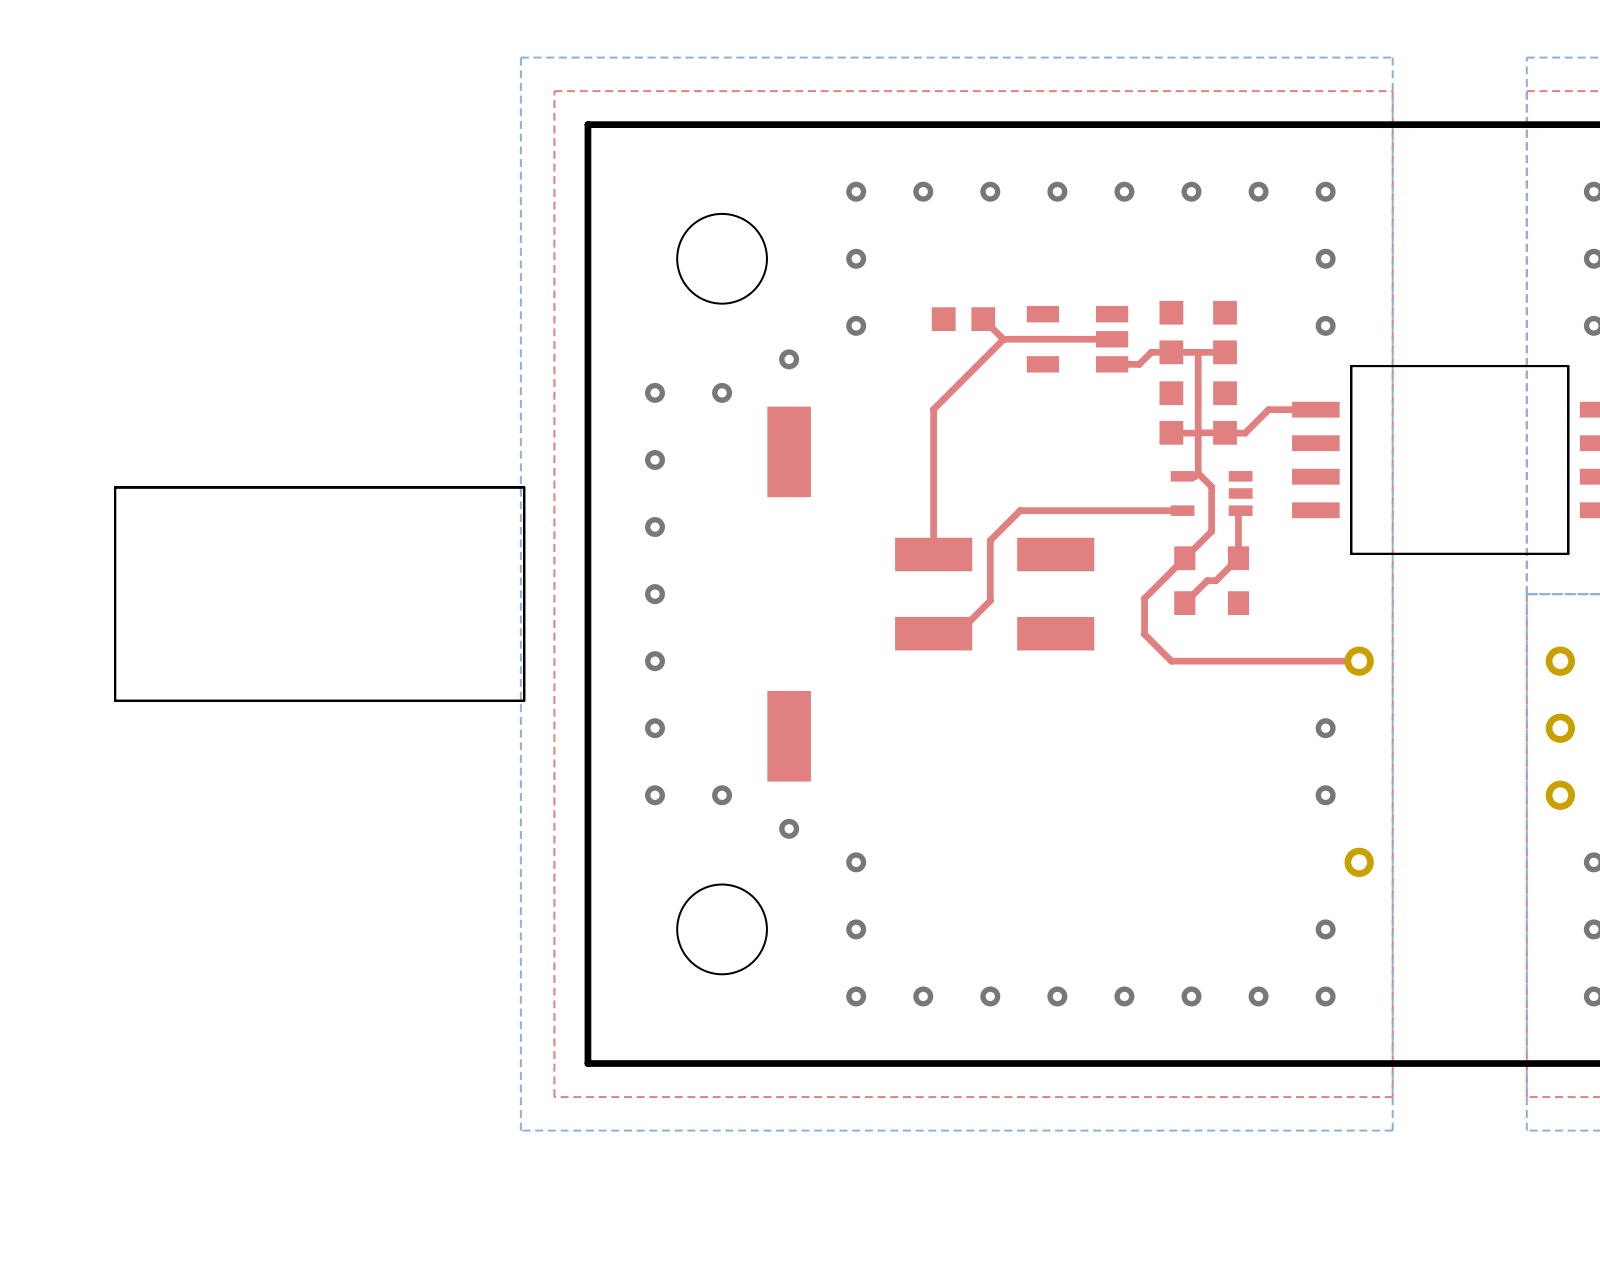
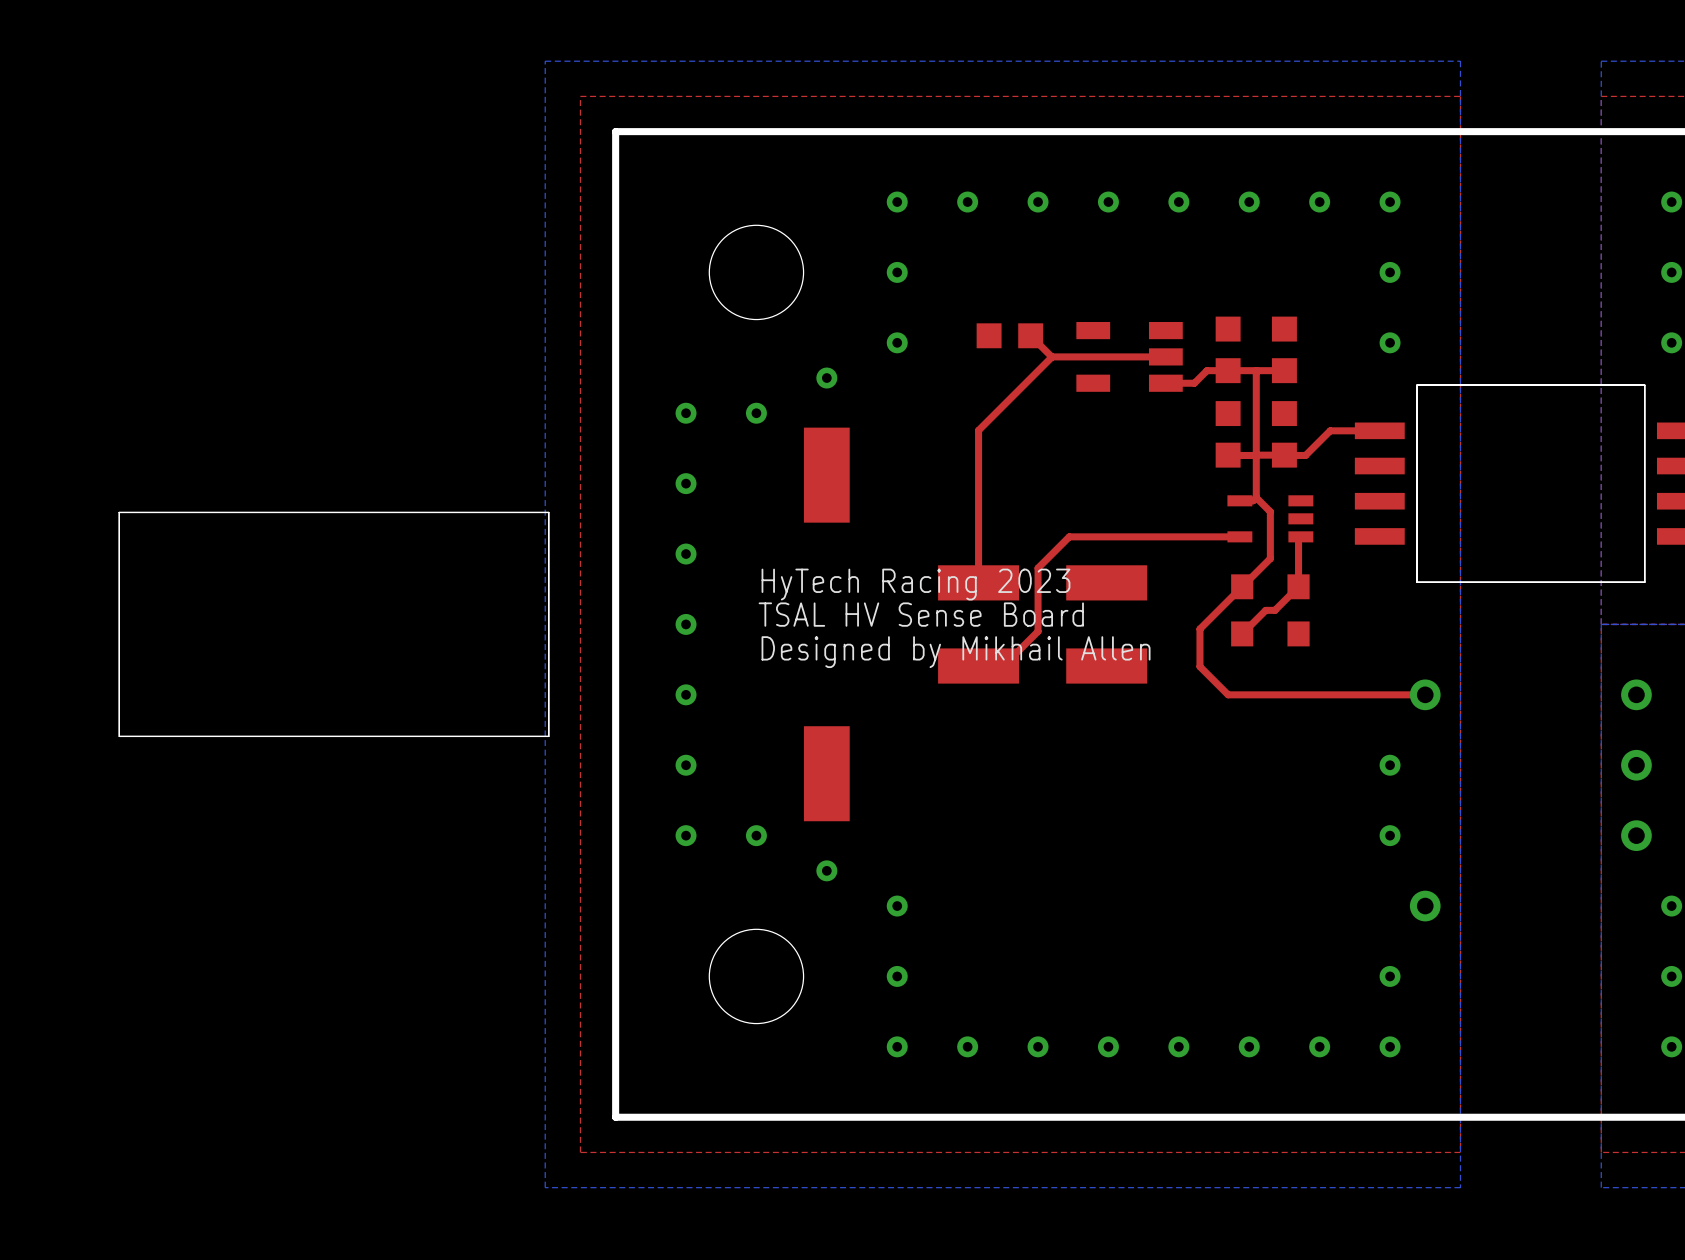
text: none -> HyTech Racing 2023 (915, 584)
text: none -> TSAL HV Sense Board (921, 614)
text: none -> Designed by Mikhail Allen (956, 652)

